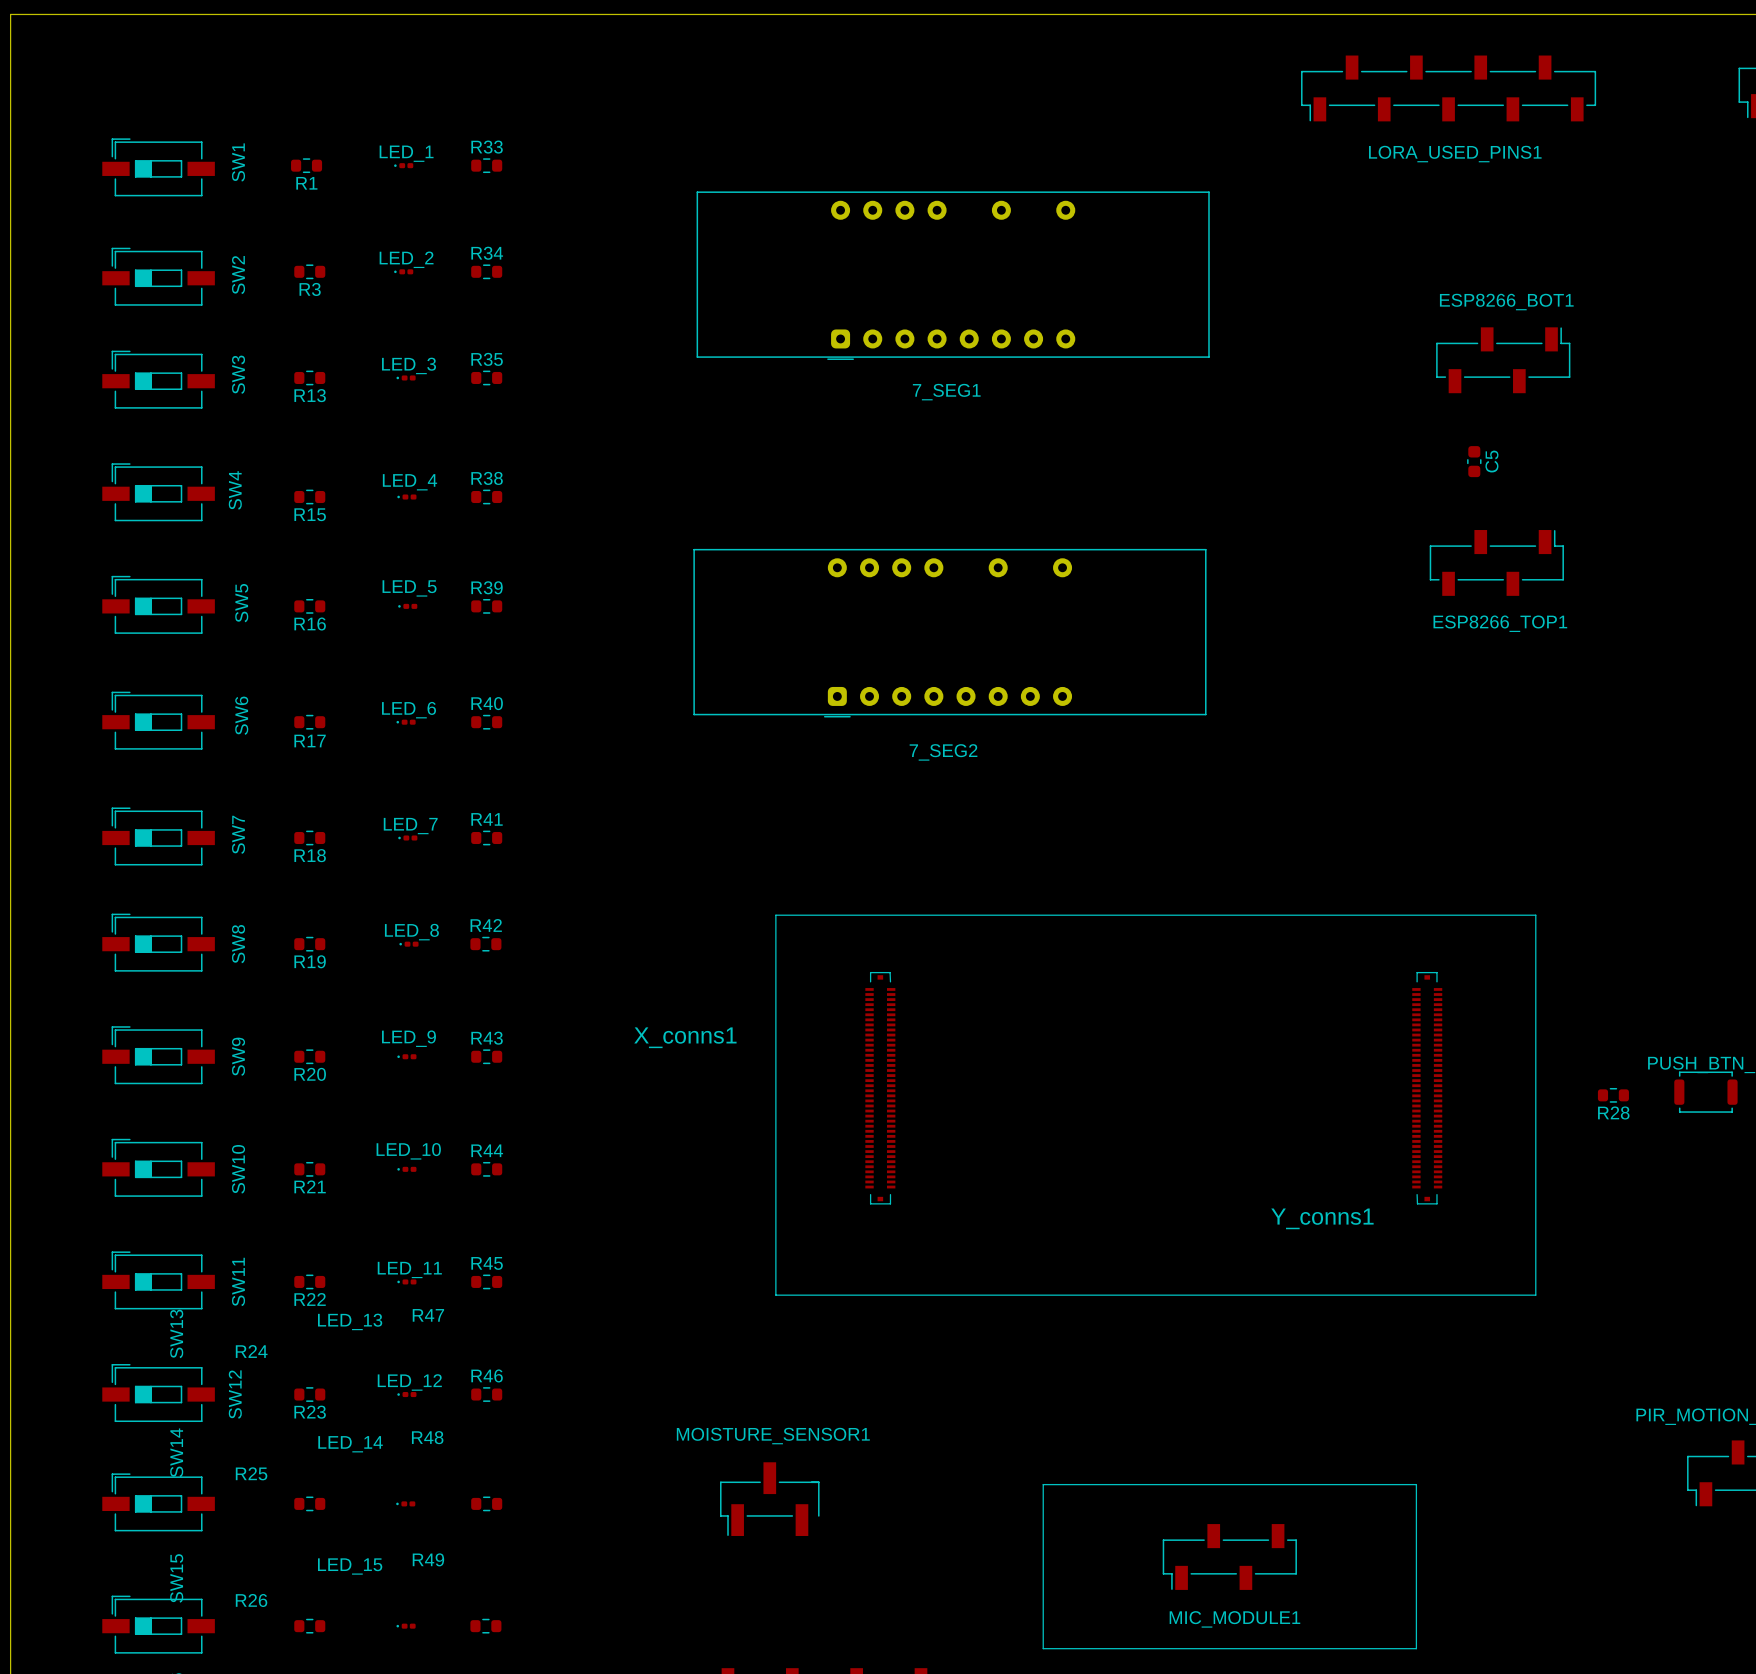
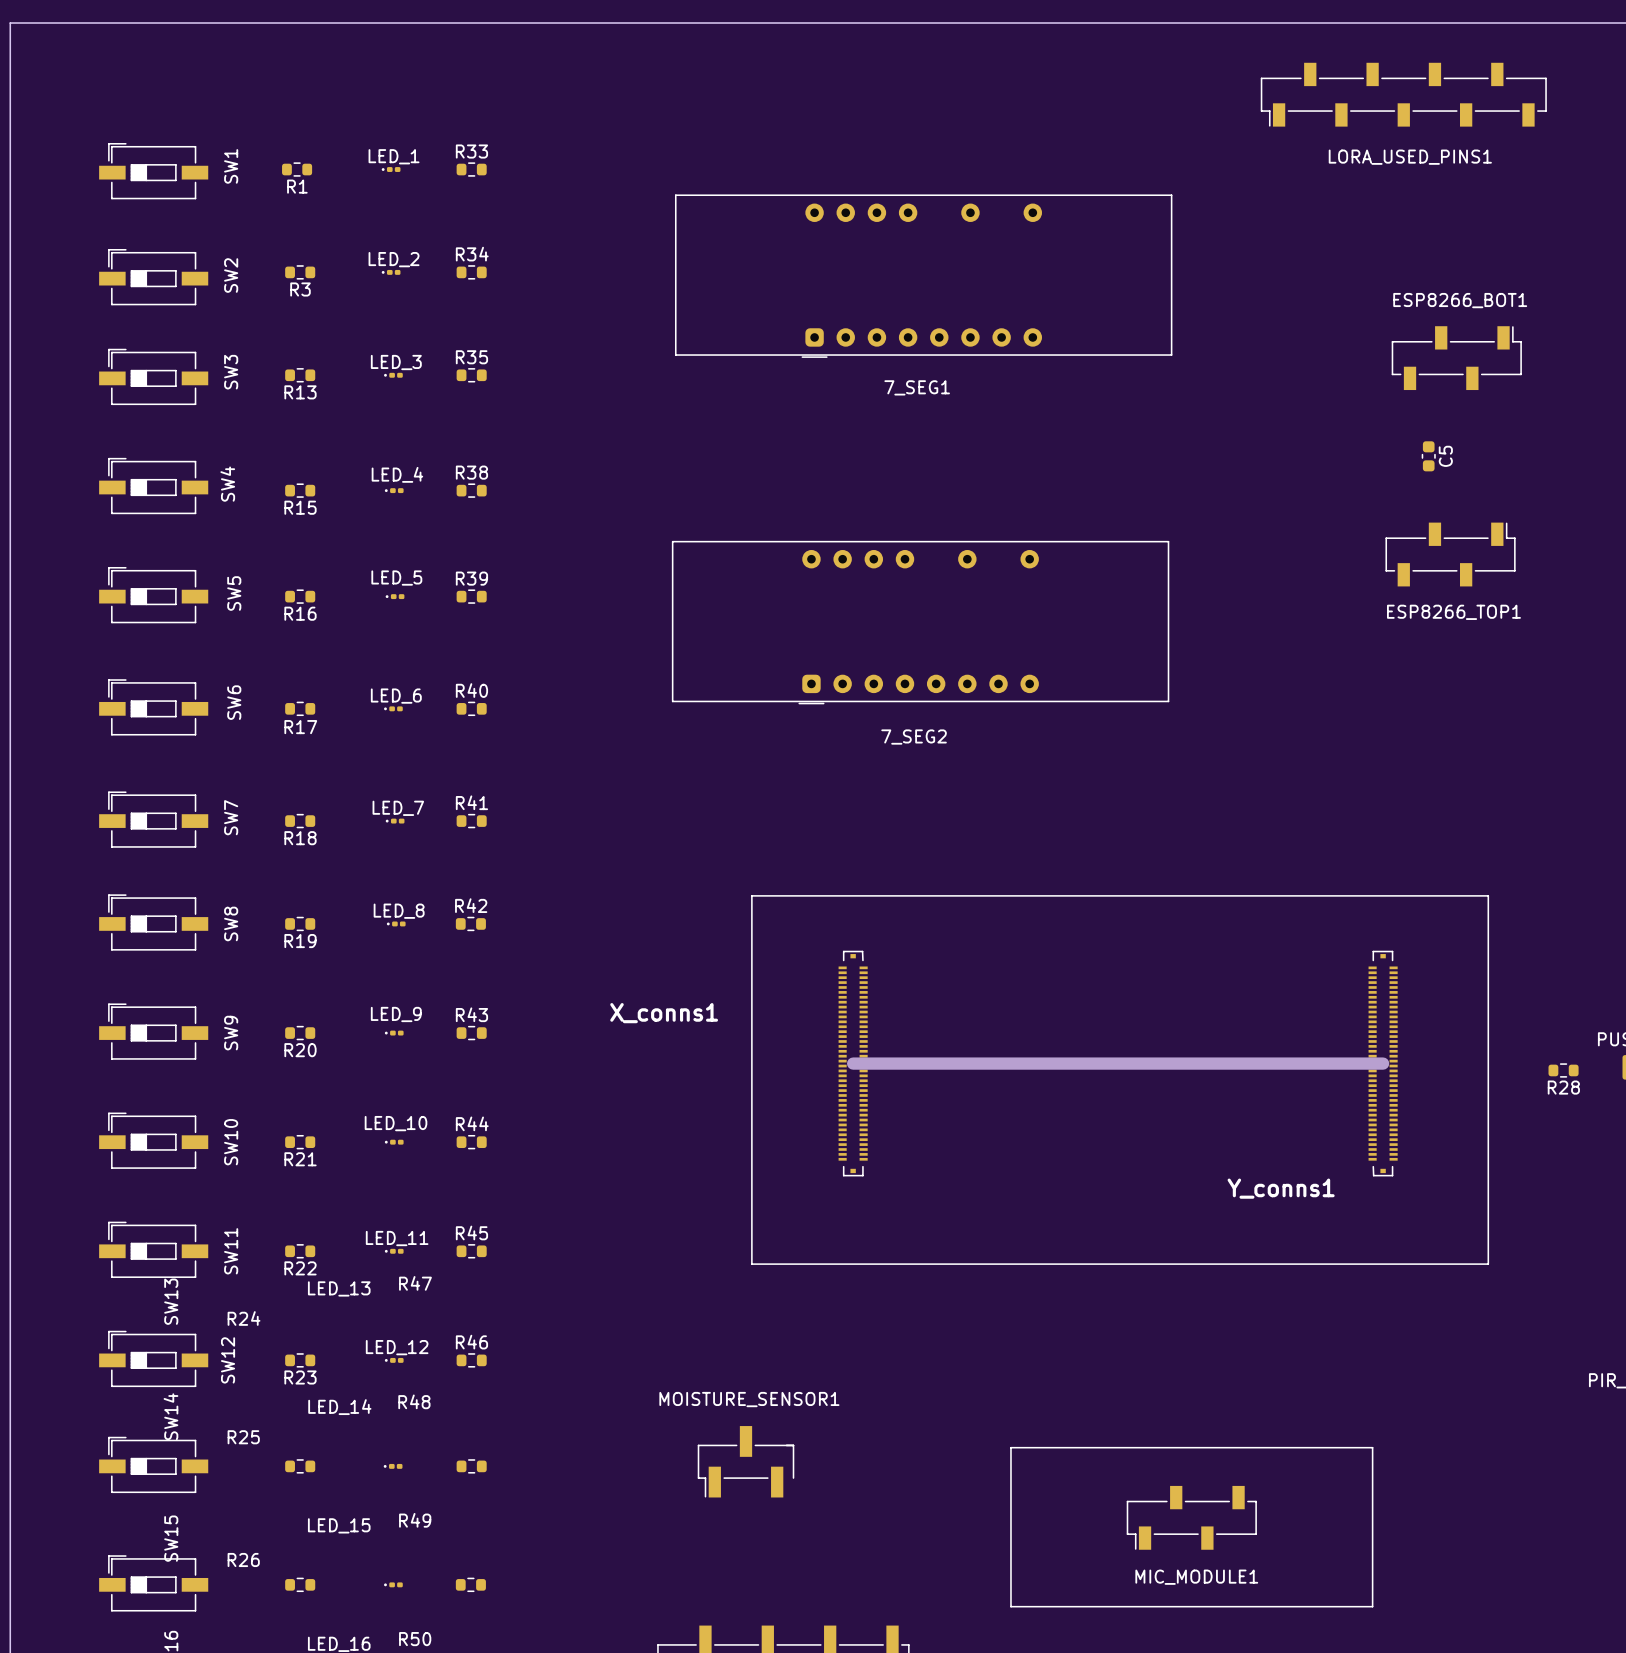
line: none -> (853, 1063) (1383, 1063)

